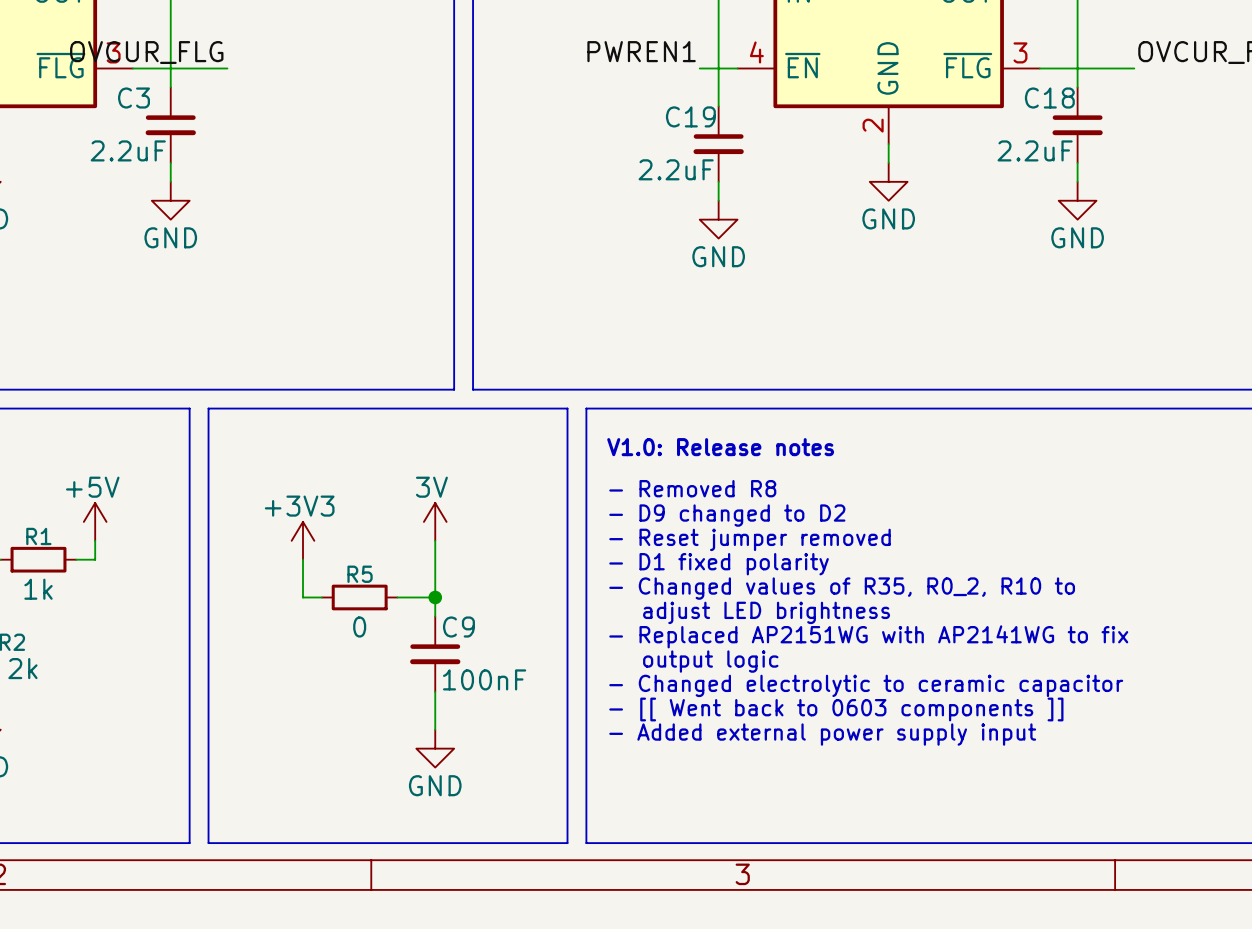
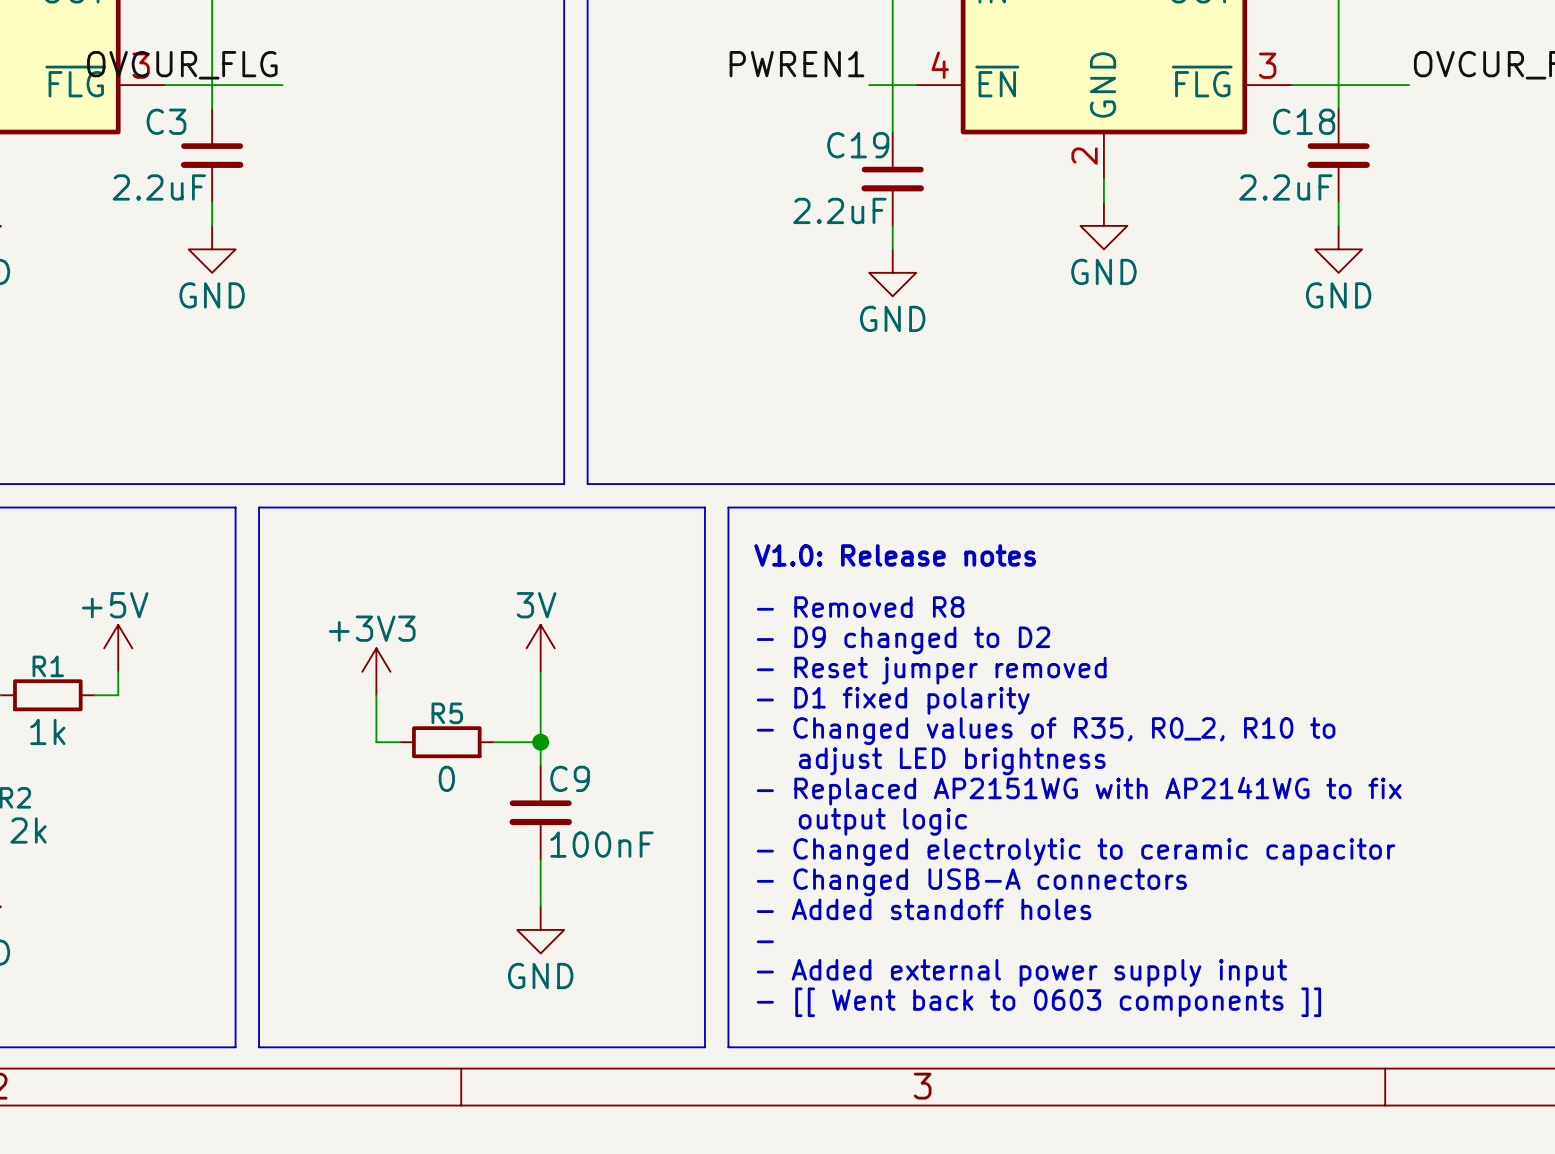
text: - [[ Went back to 0603 components ]] (836, 709) -> - Changed USB-A connectors (971, 882)
text: - Added external power supply input (822, 734) -> - Added standoff holes (924, 909)
text: none -> - (765, 941)
text: none -> - Added external power supply input (1021, 972)
text: none -> - [[ Went back to 0603 components ]] (1038, 1002)

